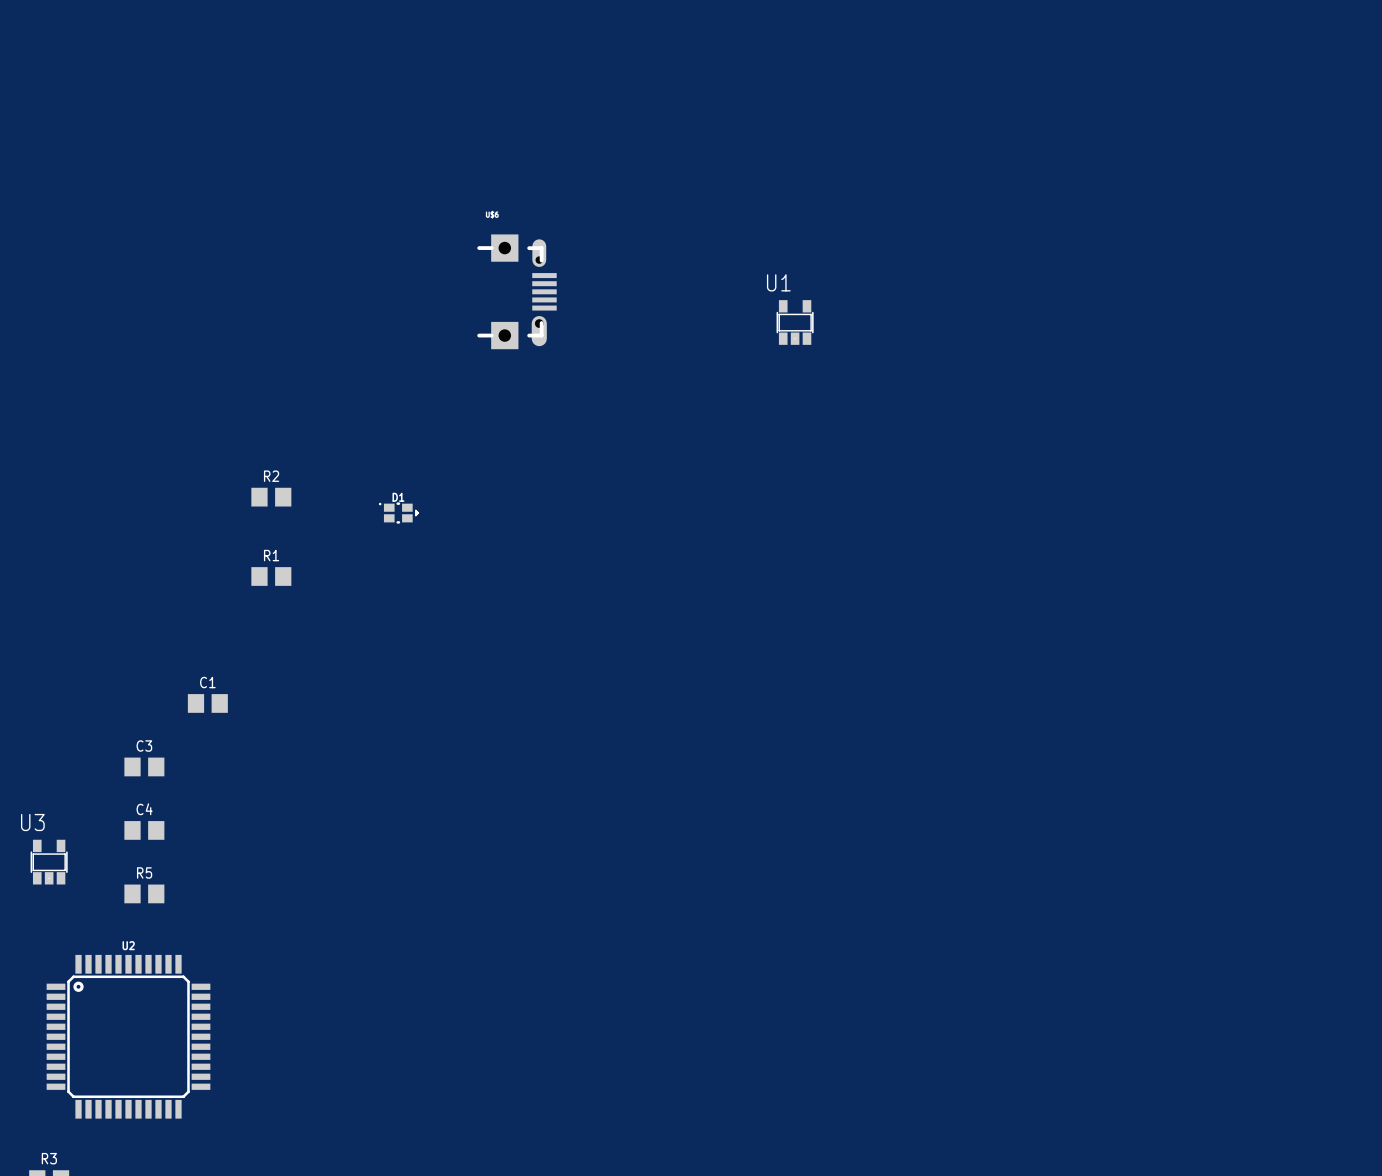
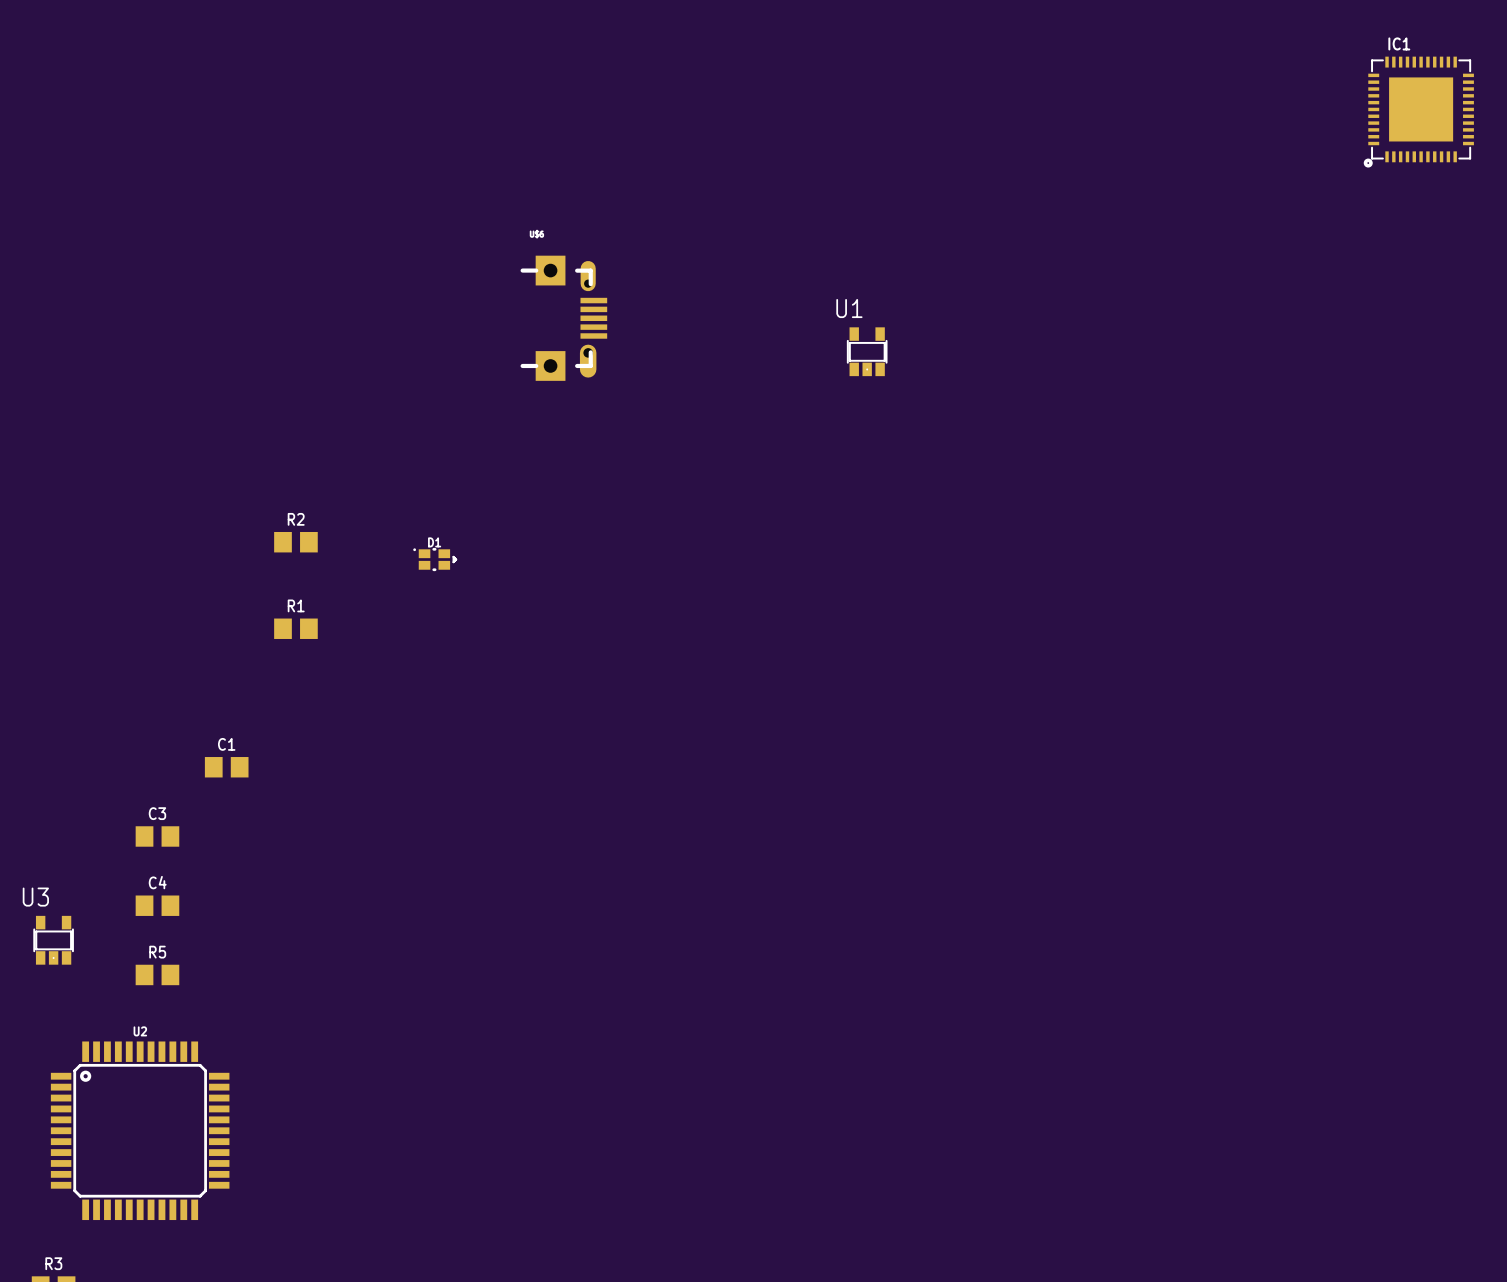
IC1: none -> (1418, 112)

